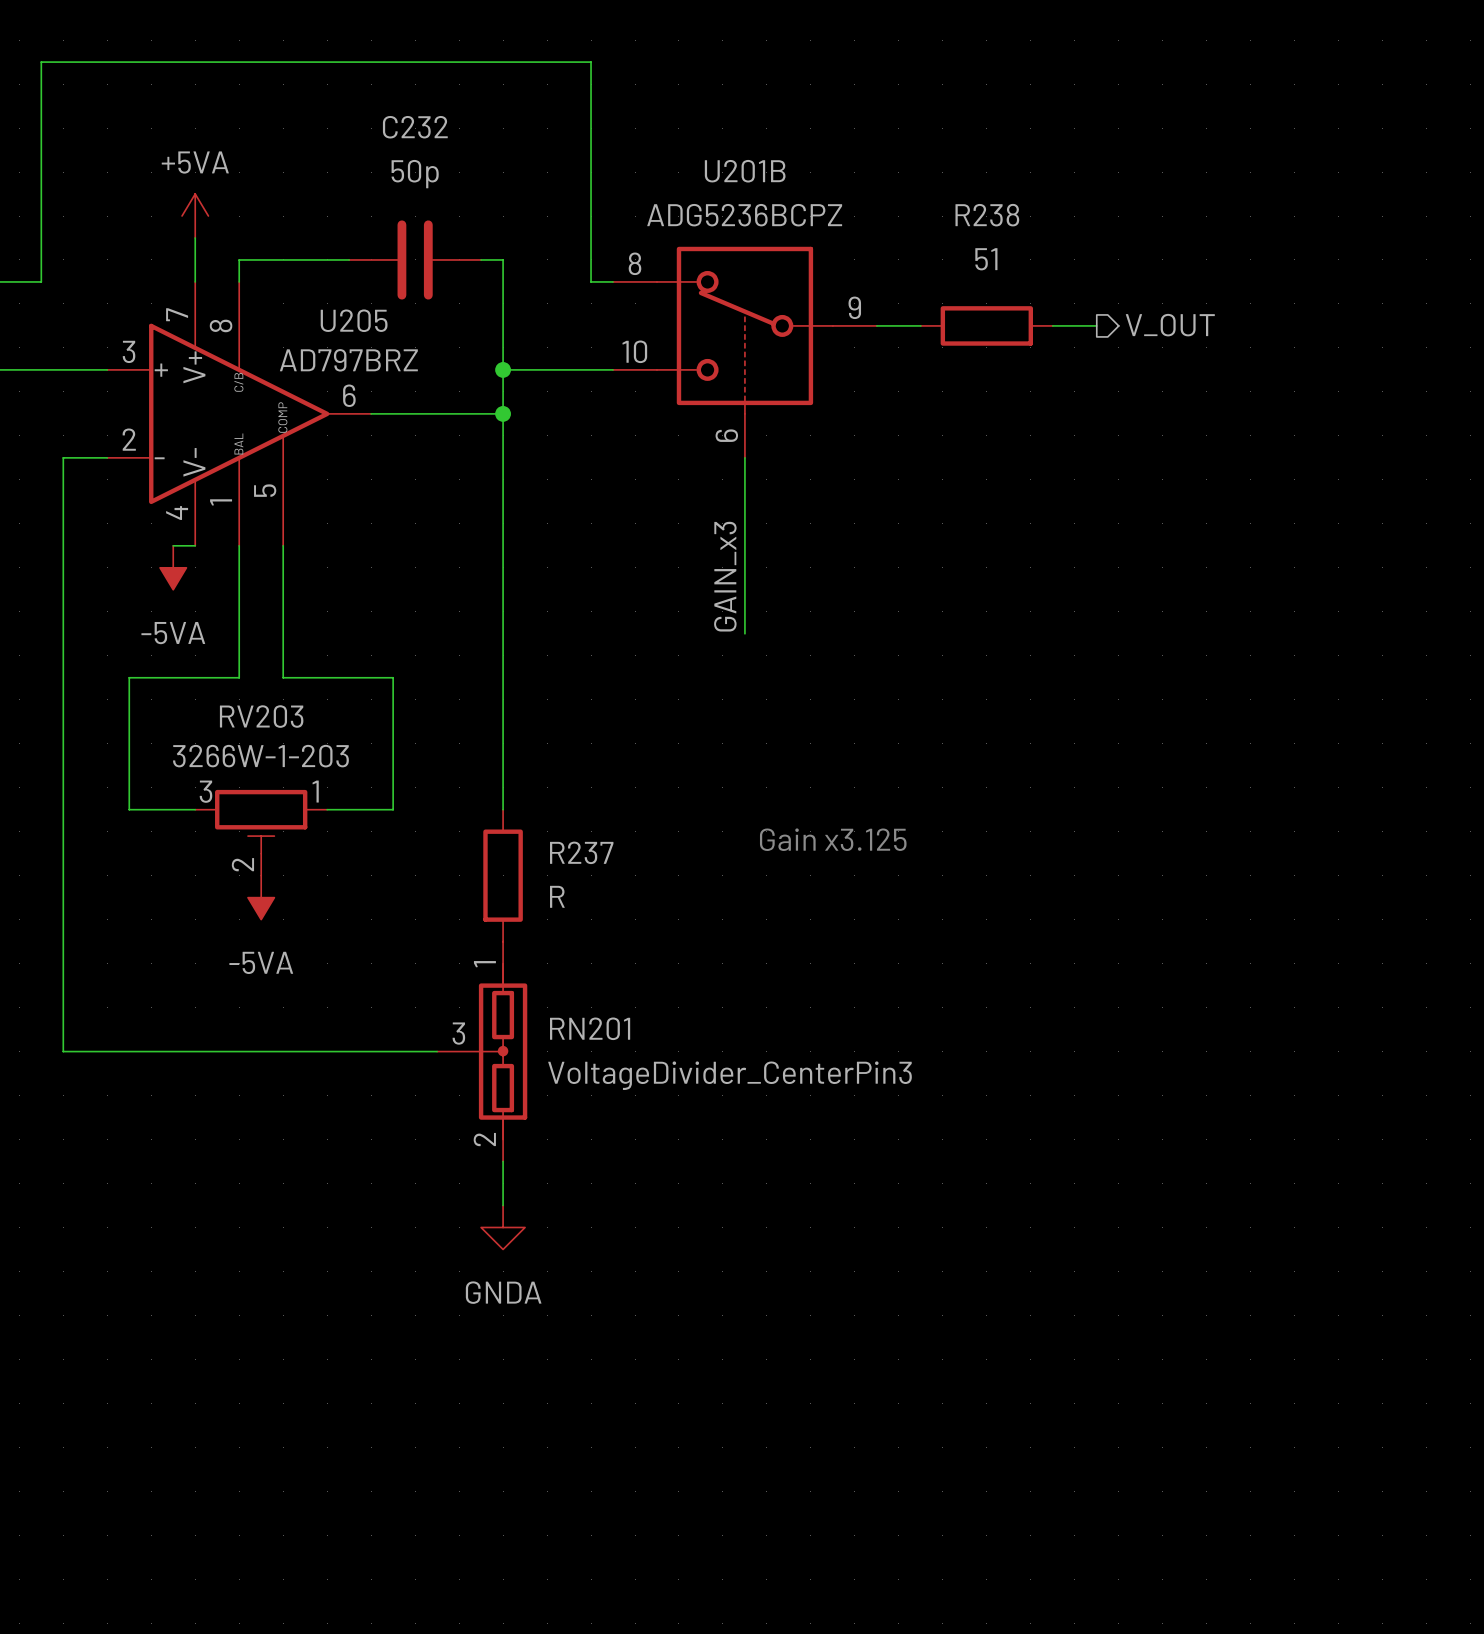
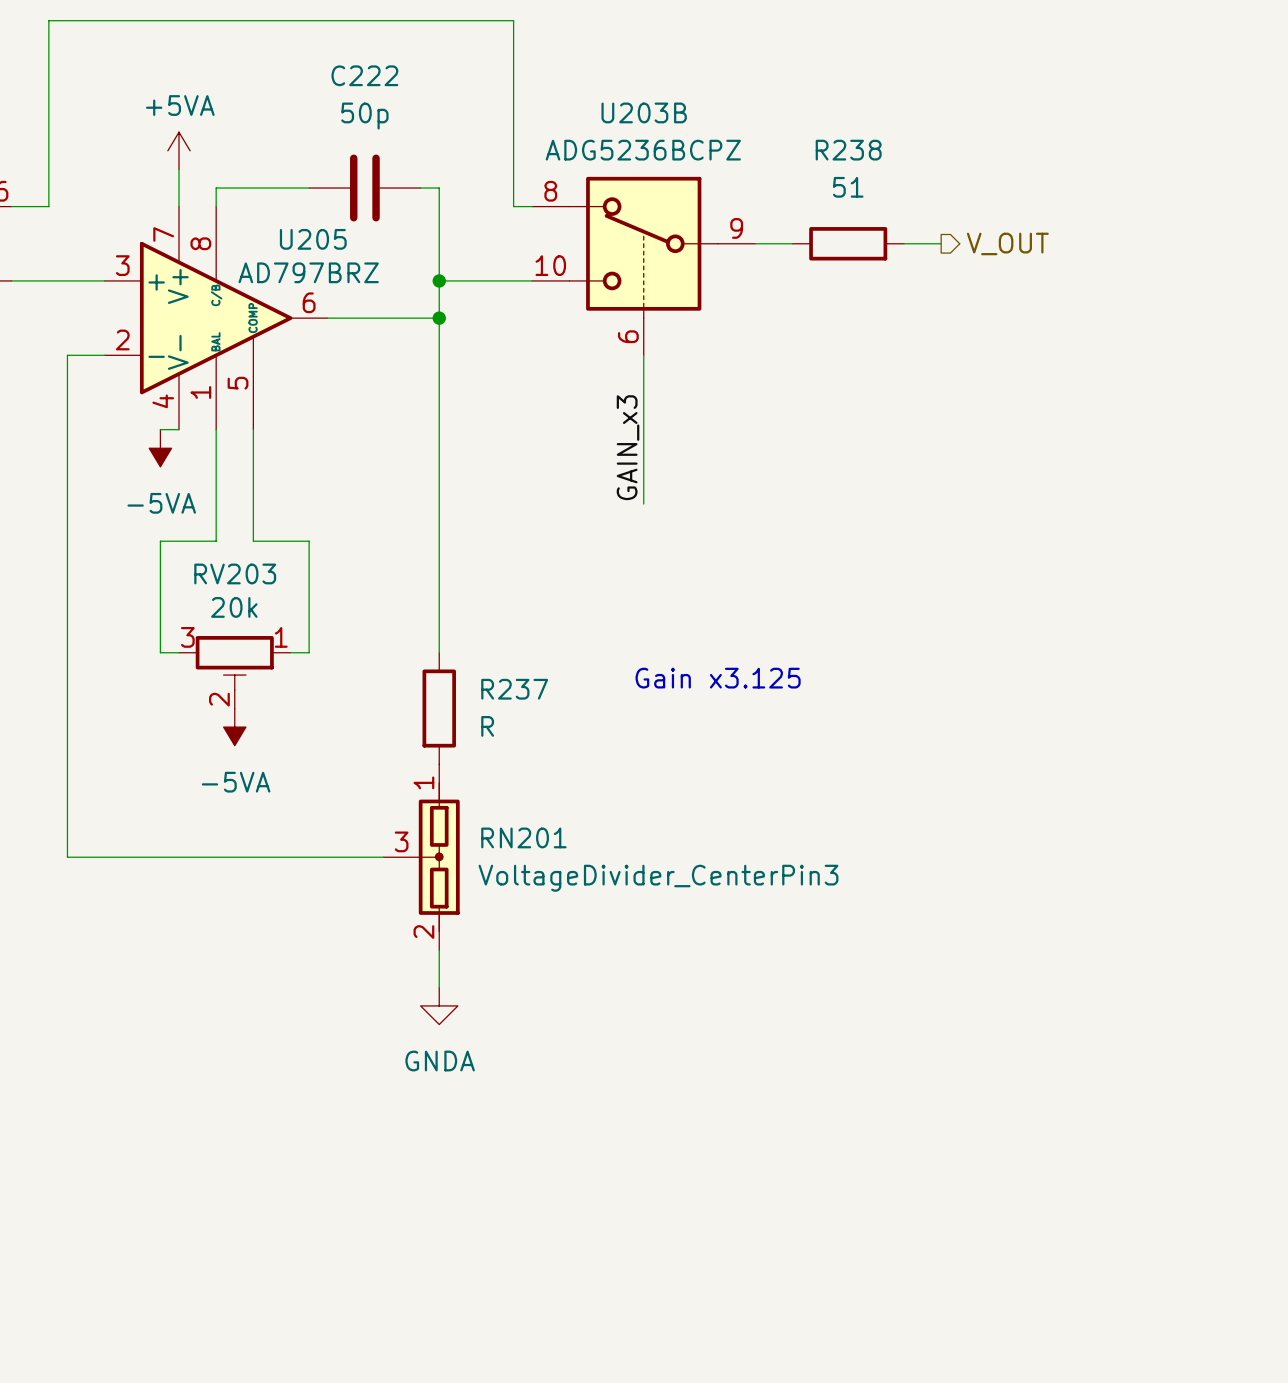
C232 name: C232 (415, 127) -> C222 (364, 75)
U201B name: U201B (745, 171) -> U203B (644, 112)
wire: (173, 677) (129, 677) (129, 809) (173, 809) -> (160, 541) (160, 652)
wire: (349, 677) (393, 677) (393, 809) (349, 809) -> (309, 541) (309, 652)
RV203 value: 3266W-1-203 (260, 756) -> 20k (234, 607)

